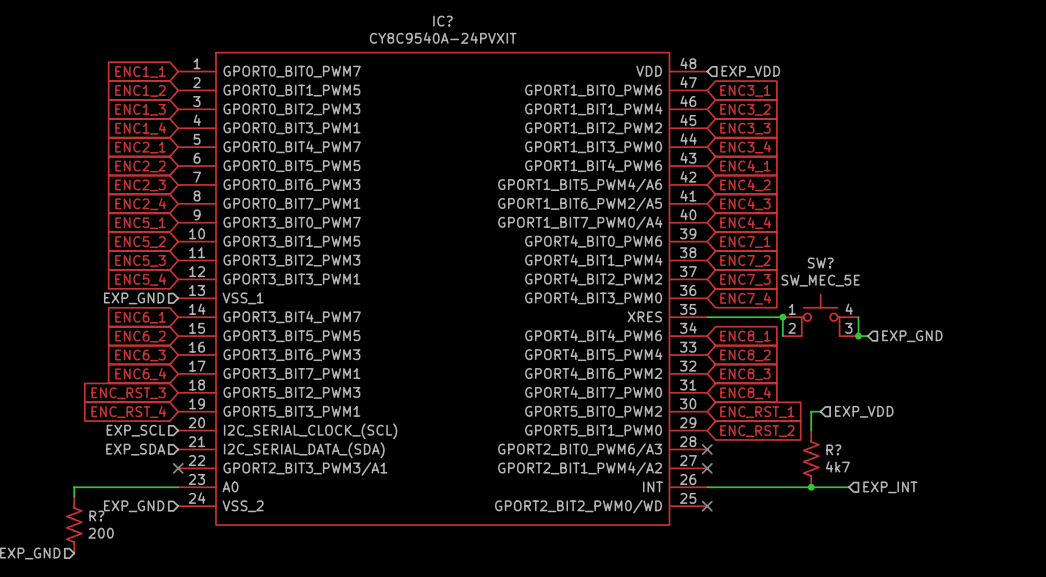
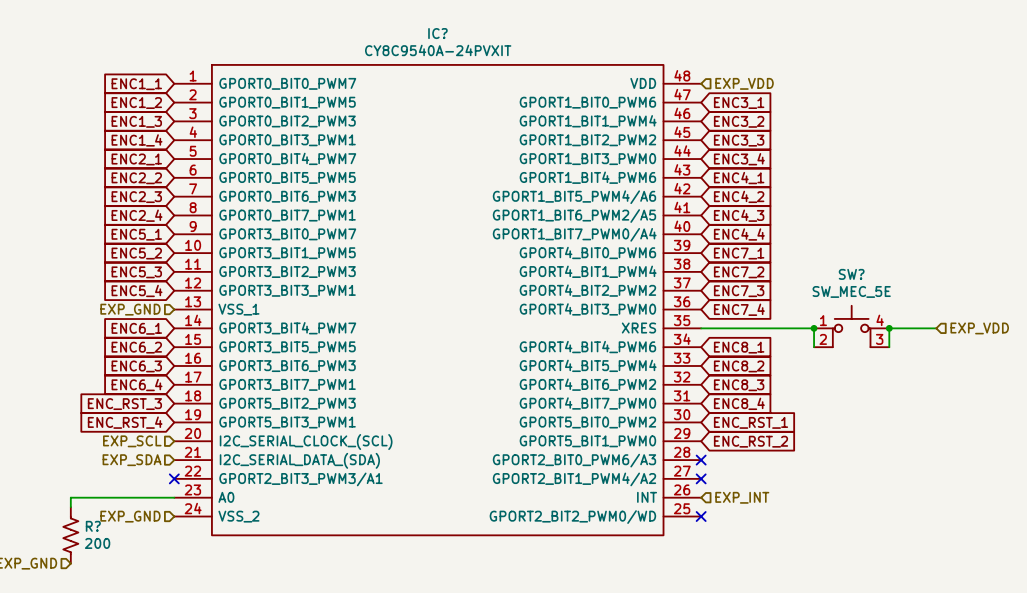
SW? position: (820, 315) -> (851, 326)
wire: (782, 317) (782, 336) -> (776, 328) (814, 328) (814, 347)
junction: (782, 317) -> none
junction: none -> (814, 328)
wire: (858, 317) (858, 336) (867, 336) -> none
junction: none -> (889, 328)
wire: none -> (936, 328) (889, 328) (889, 347)
junction: (858, 336) -> none
hierarchical label: EXP_GND (912, 336) -> none
wire: (820, 411) (811, 411) (811, 430) -> none
hierarchical label position: EXP_VDD (864, 411) -> EXP_VDD (979, 328)
R?: 4k7 (811, 458) -> none
wire: (707, 487) (849, 487) -> none
junction: (811, 487) -> none
hierarchical label position: EXP_INT (890, 487) -> EXP_INT (742, 497)

